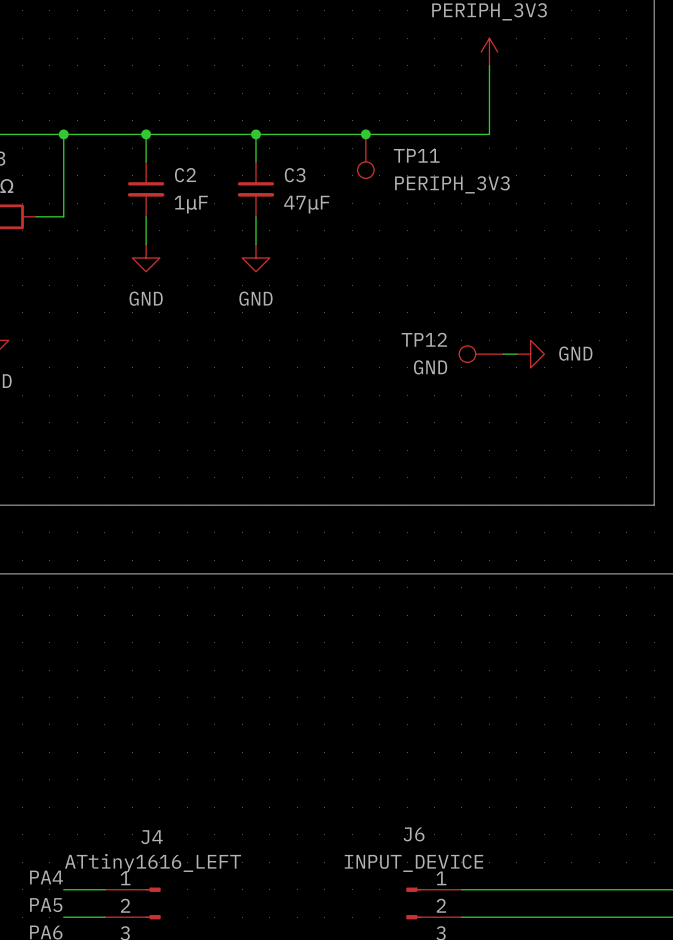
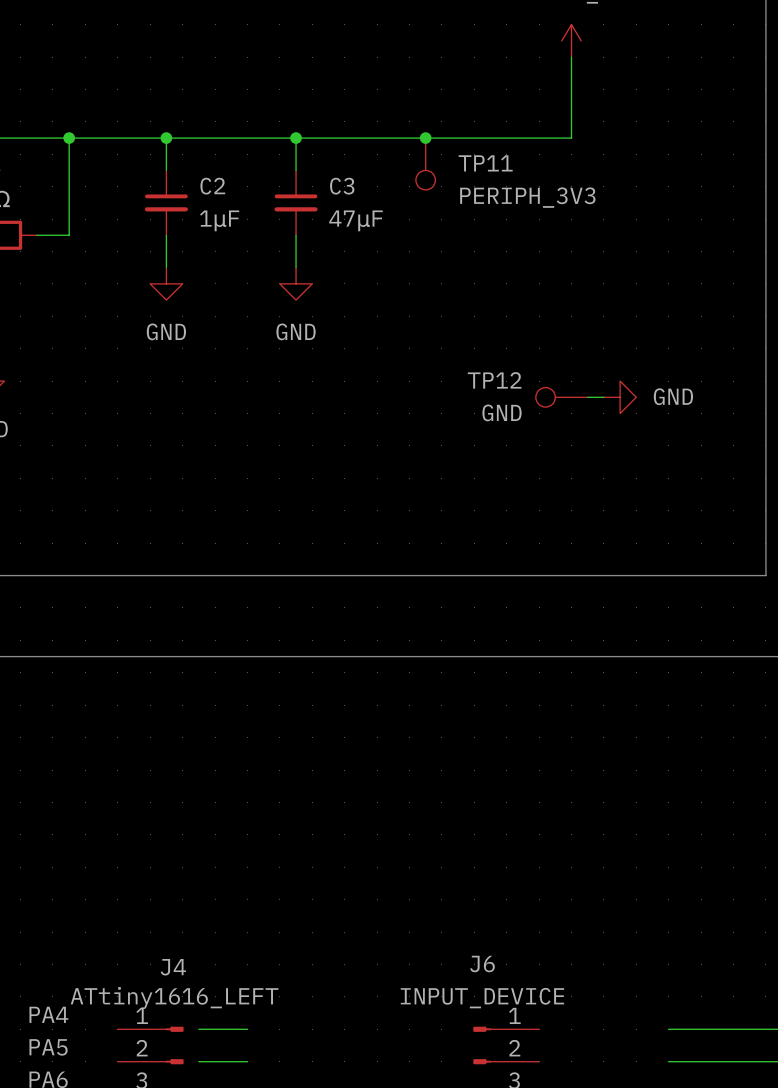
wire: (63, 889) (104, 889) -> (198, 1029) (247, 1029)
wire: (461, 889) (571, 889) -> none
wire: (63, 917) (104, 917) -> (198, 1061) (247, 1061)
wire: (461, 917) (571, 917) -> none

